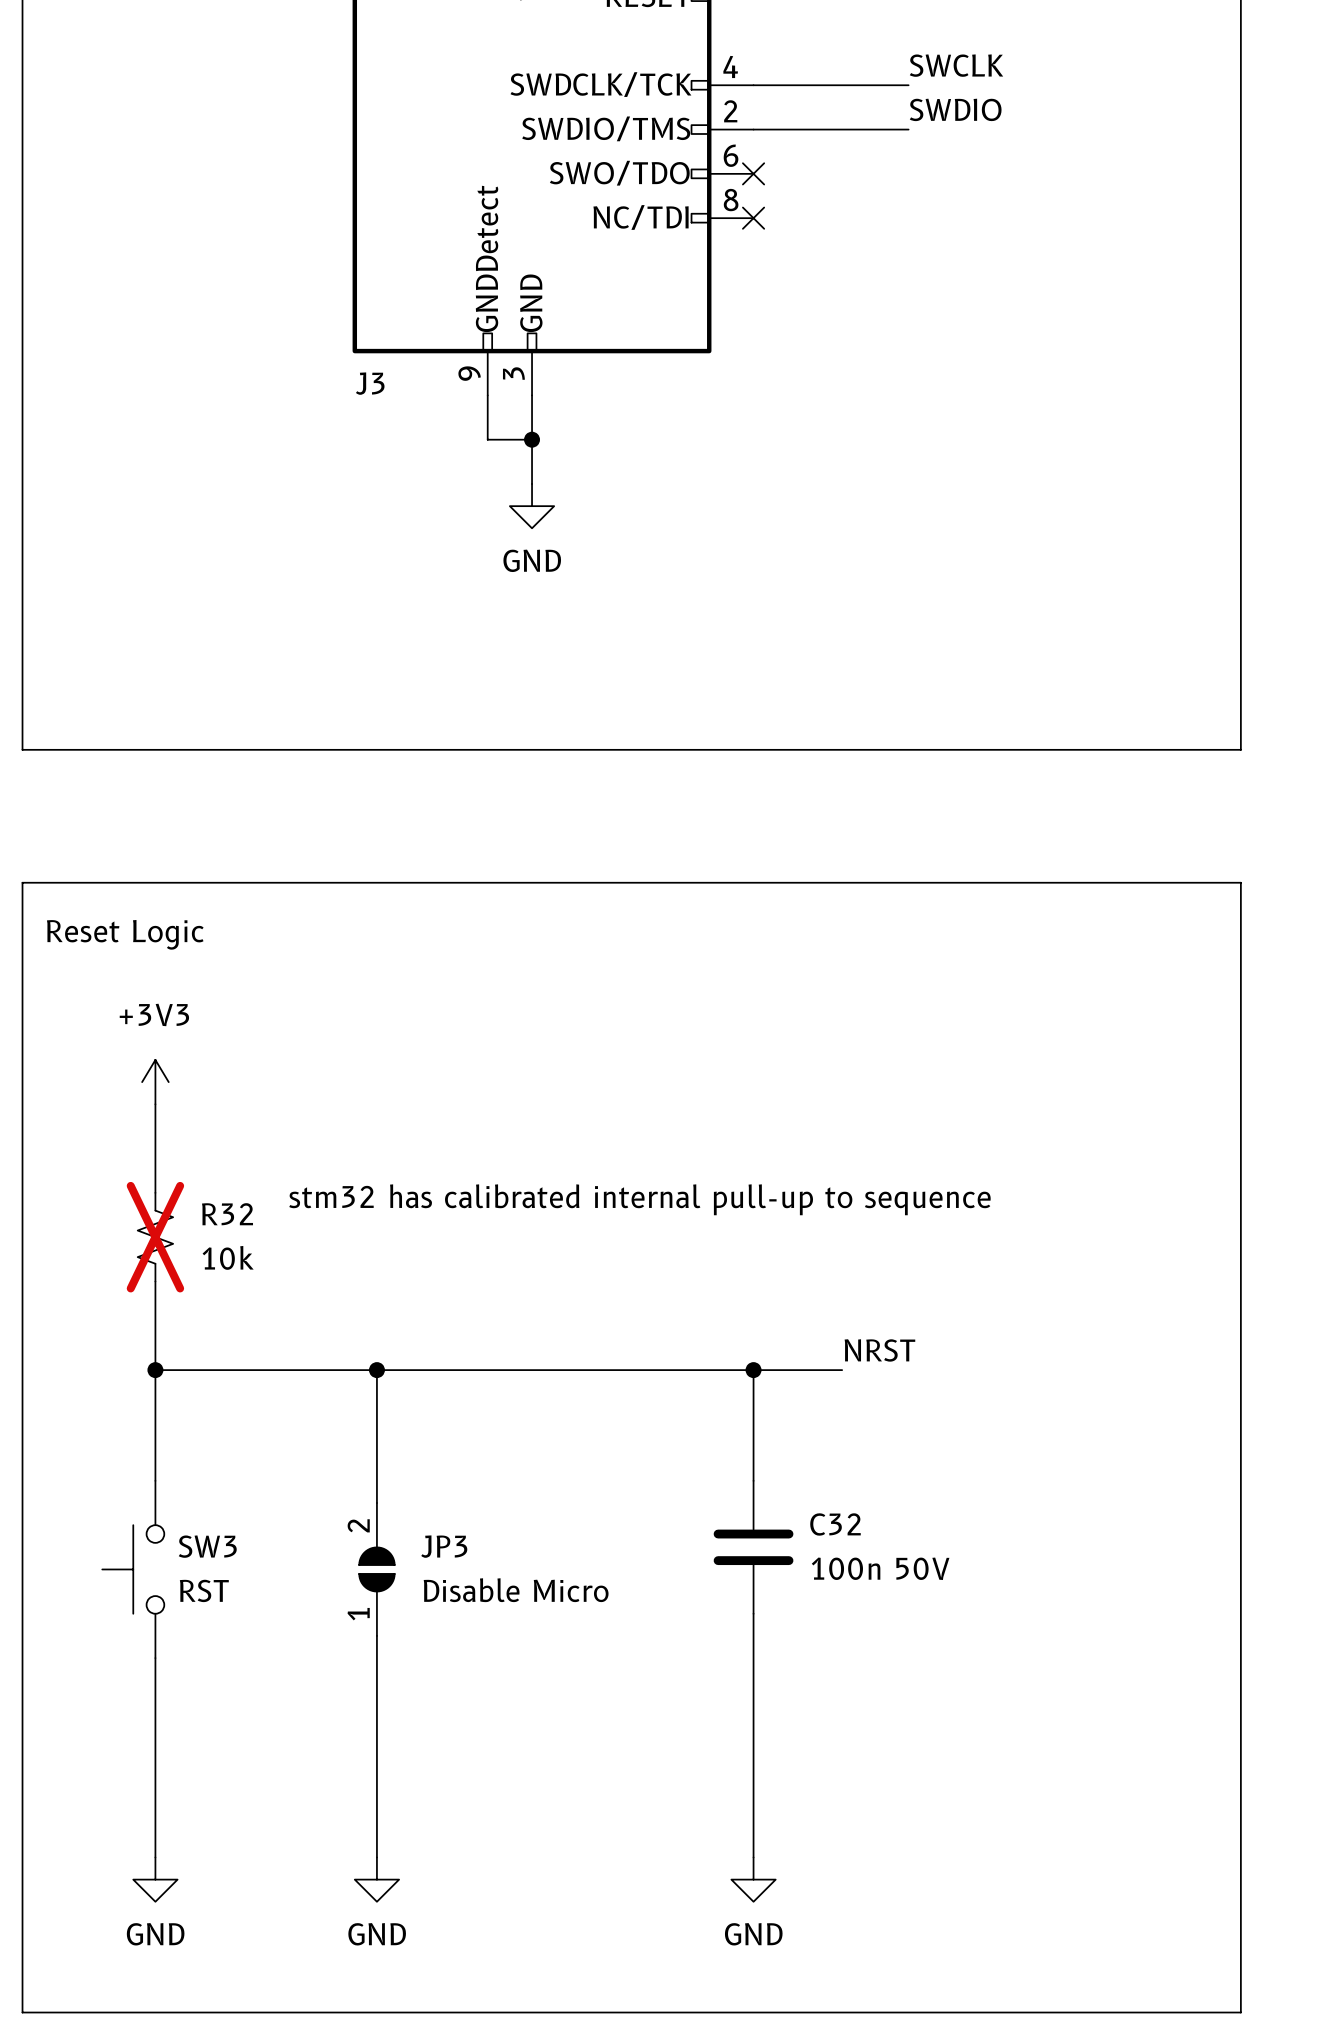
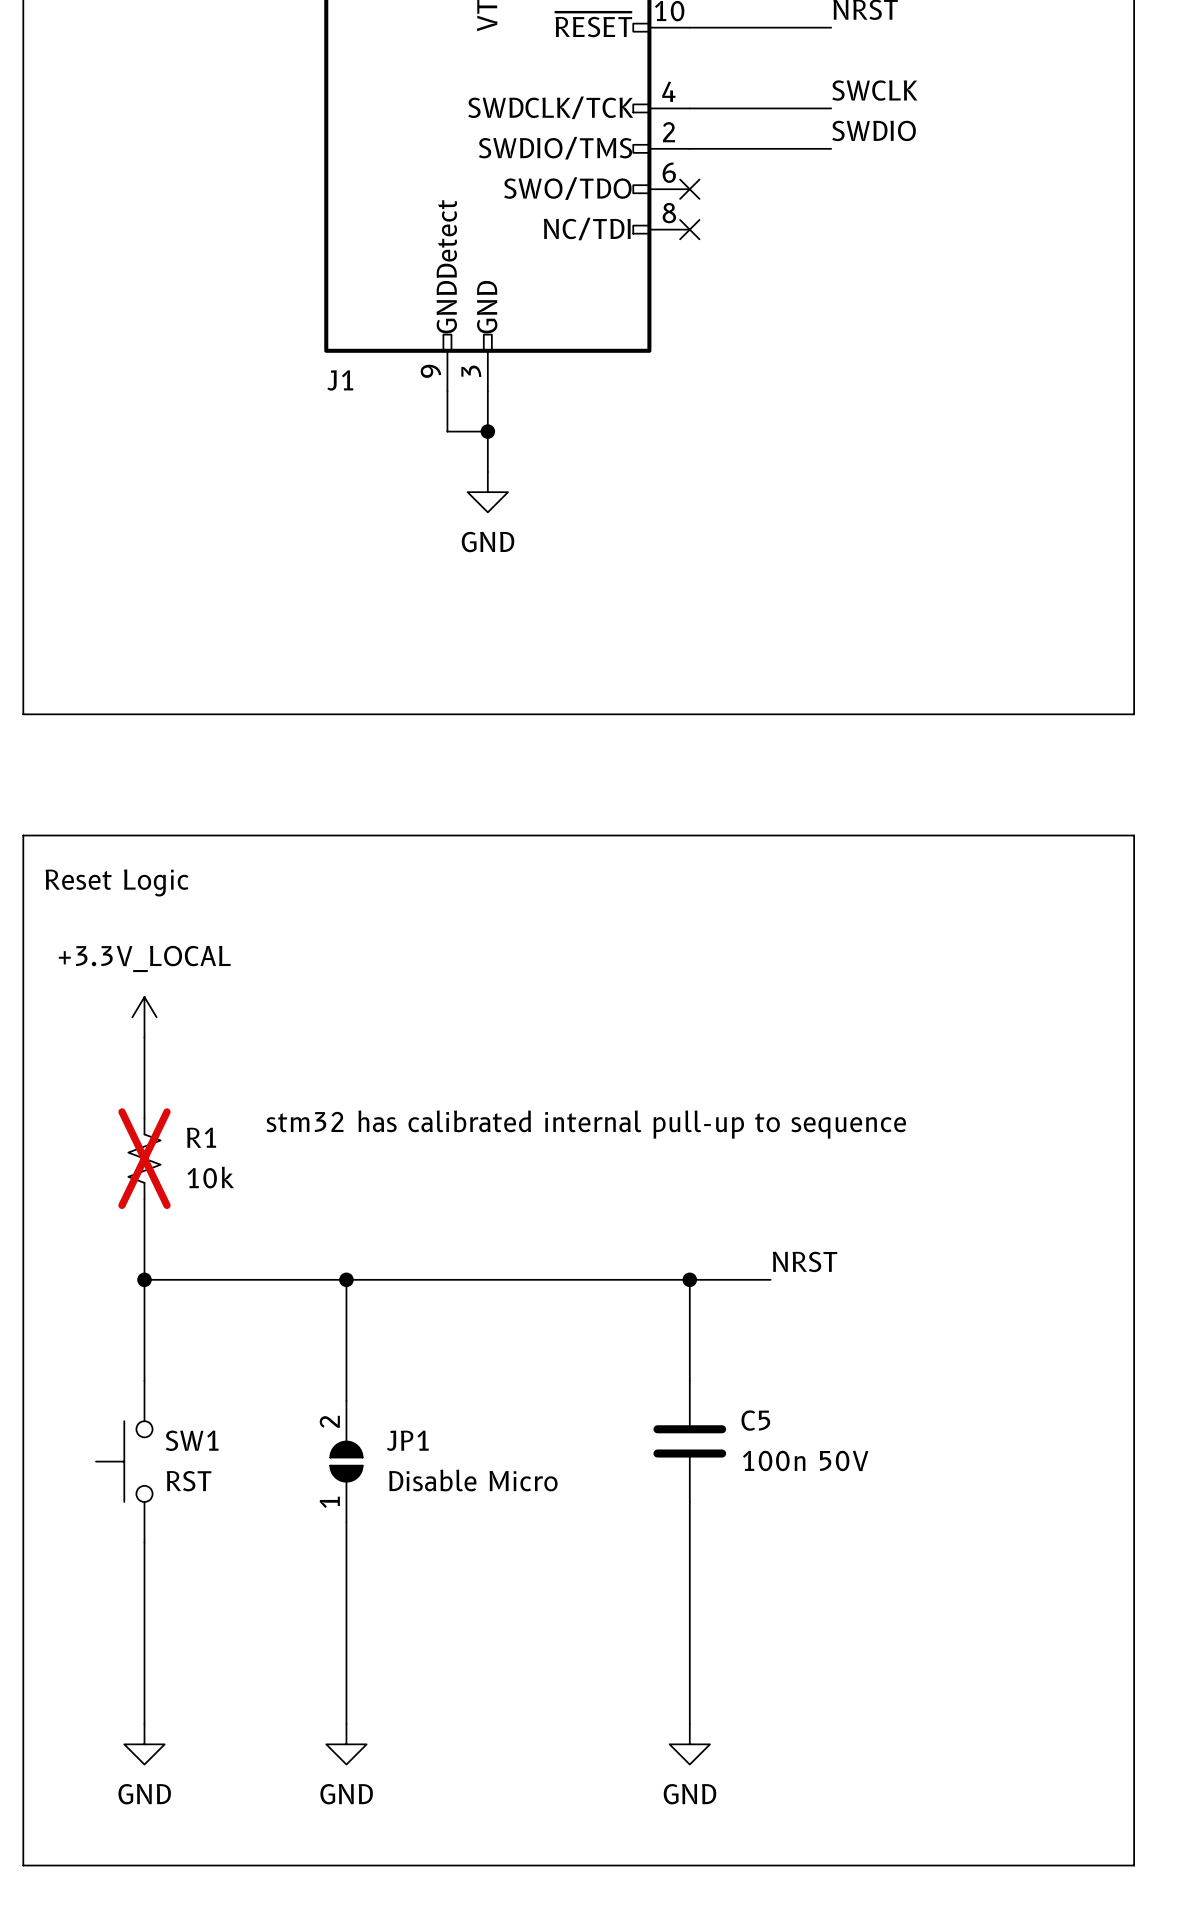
J3 name: J3 (370, 383) -> J1 (340, 380)
power symbol: +3V3 (155, 1082) -> +3.3V_LOCAL (144, 1017)
R32 name: R32 (227, 1214) -> R1 (201, 1137)
C32 name: C32 (835, 1524) -> C5 (755, 1420)
SW3 name: SW3 (207, 1546) -> SW1 (192, 1440)
JP3 name: JP3 (444, 1546) -> JP1 (407, 1440)

